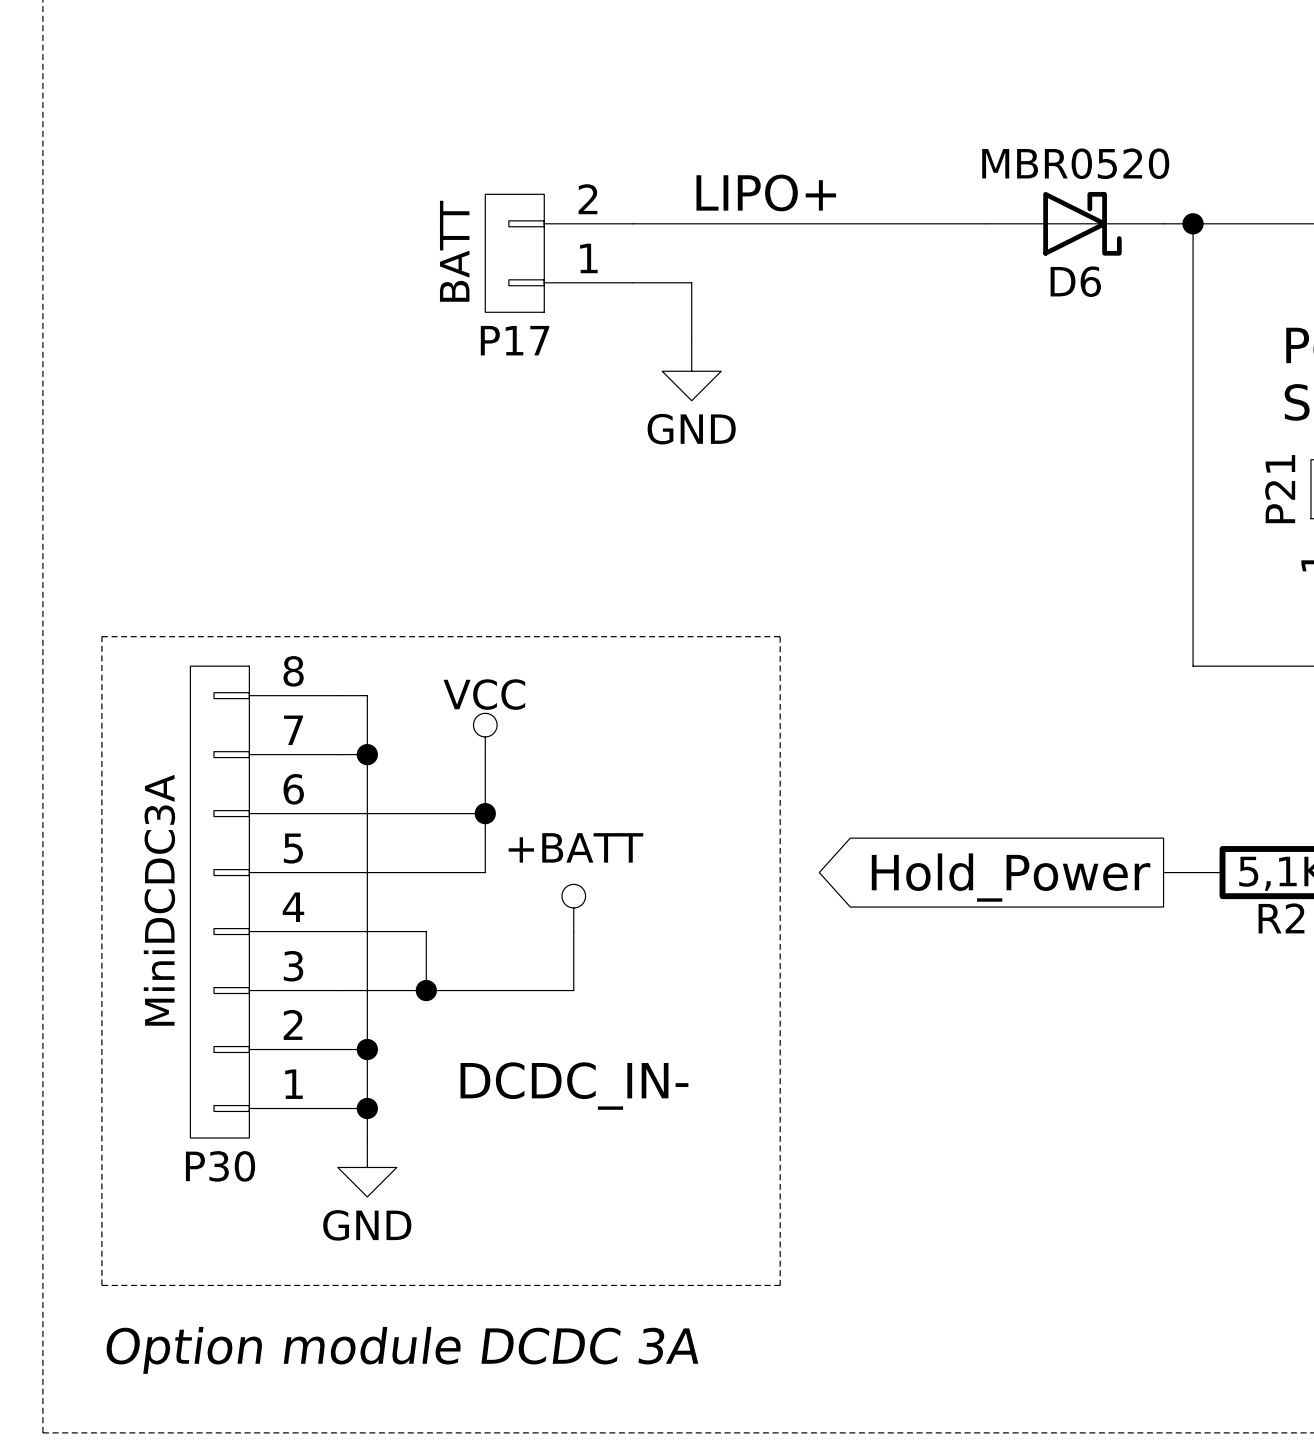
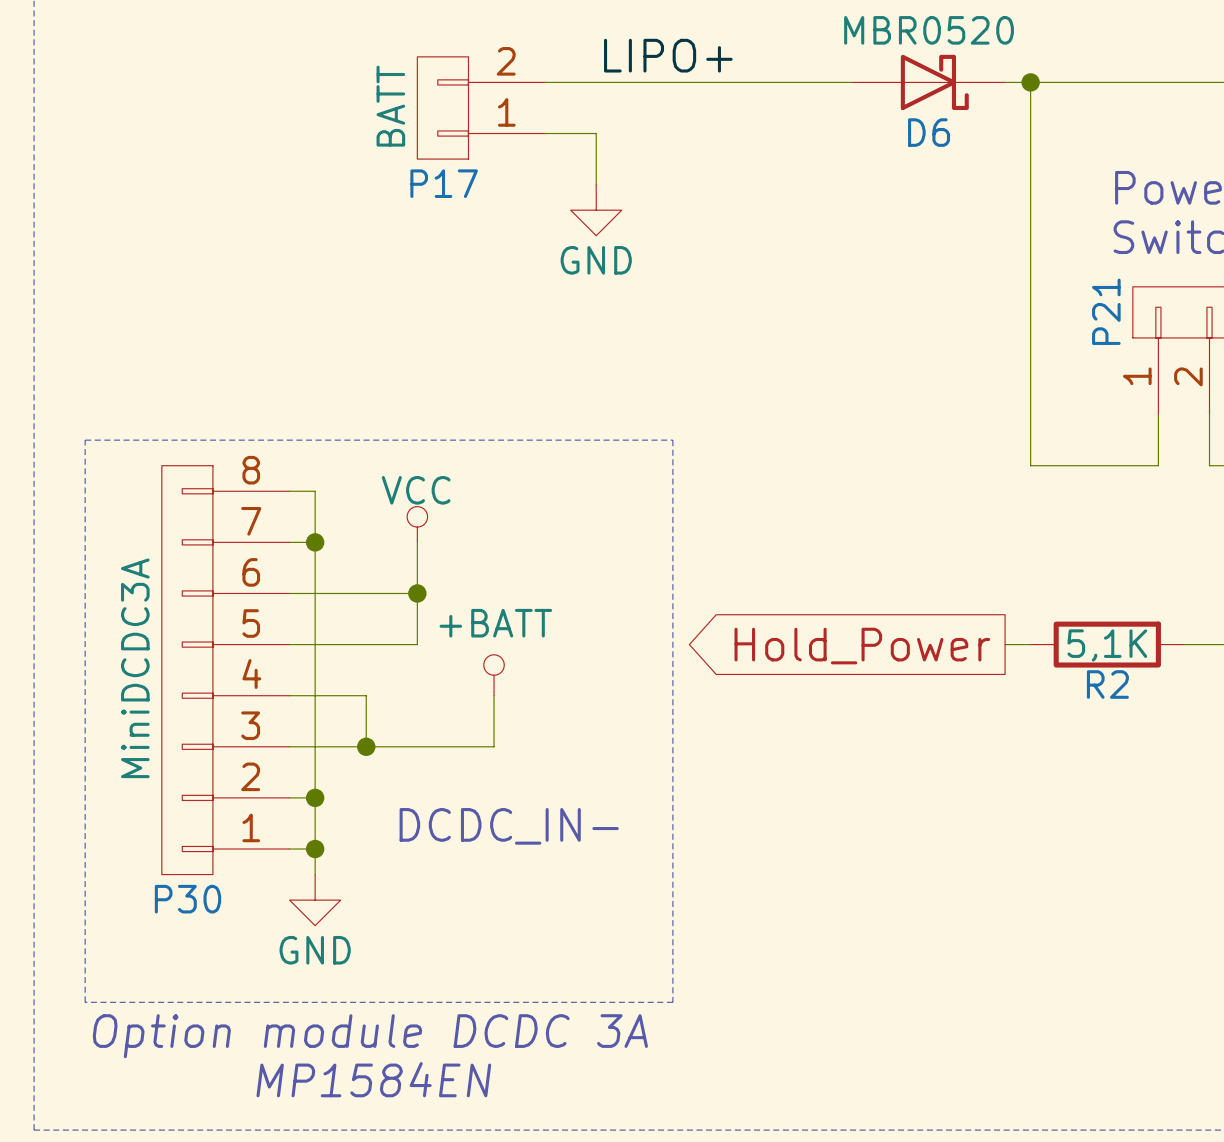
text position: Option module DCDC 3A (402, 1350) -> Option module DCDC 3A (370, 1036)
text: none -> MP1584EN (373, 1079)

